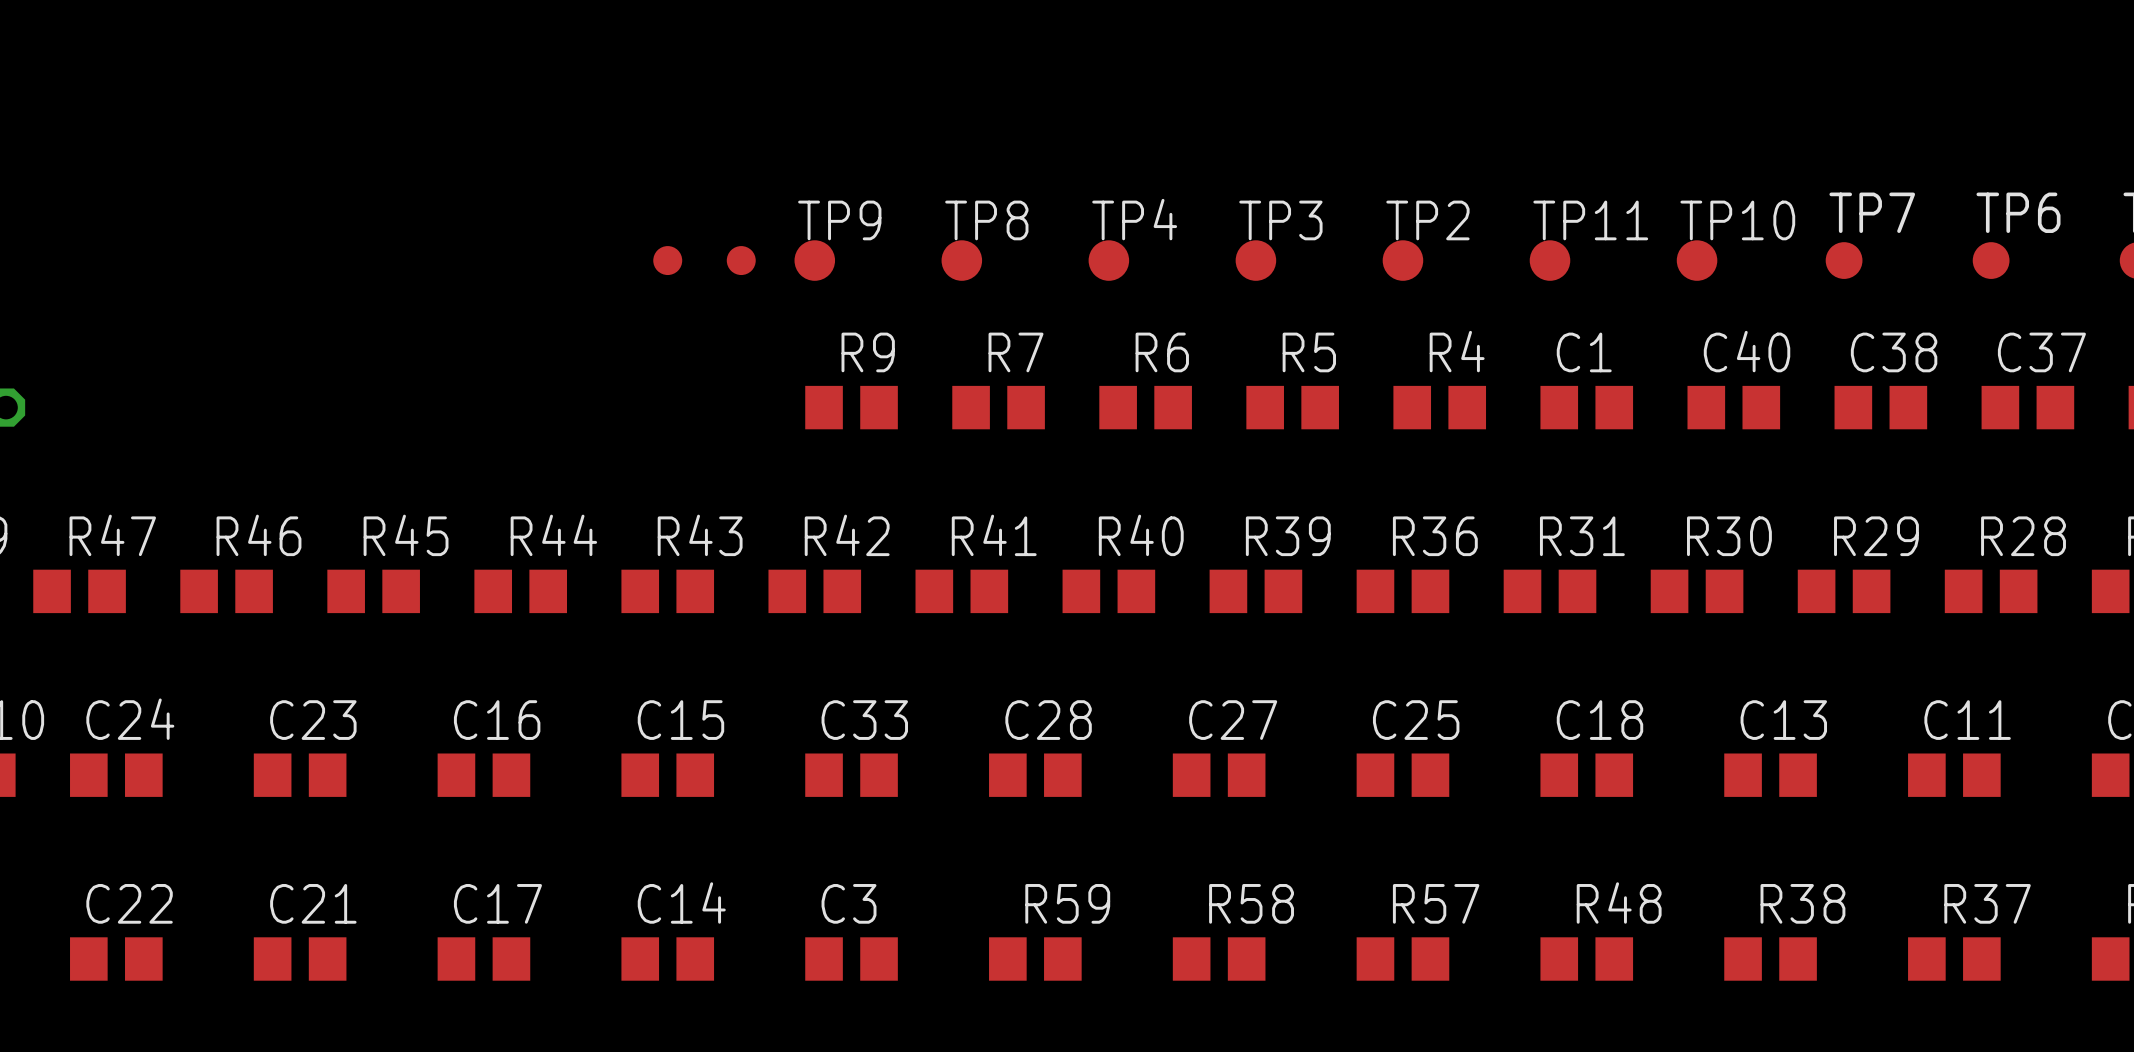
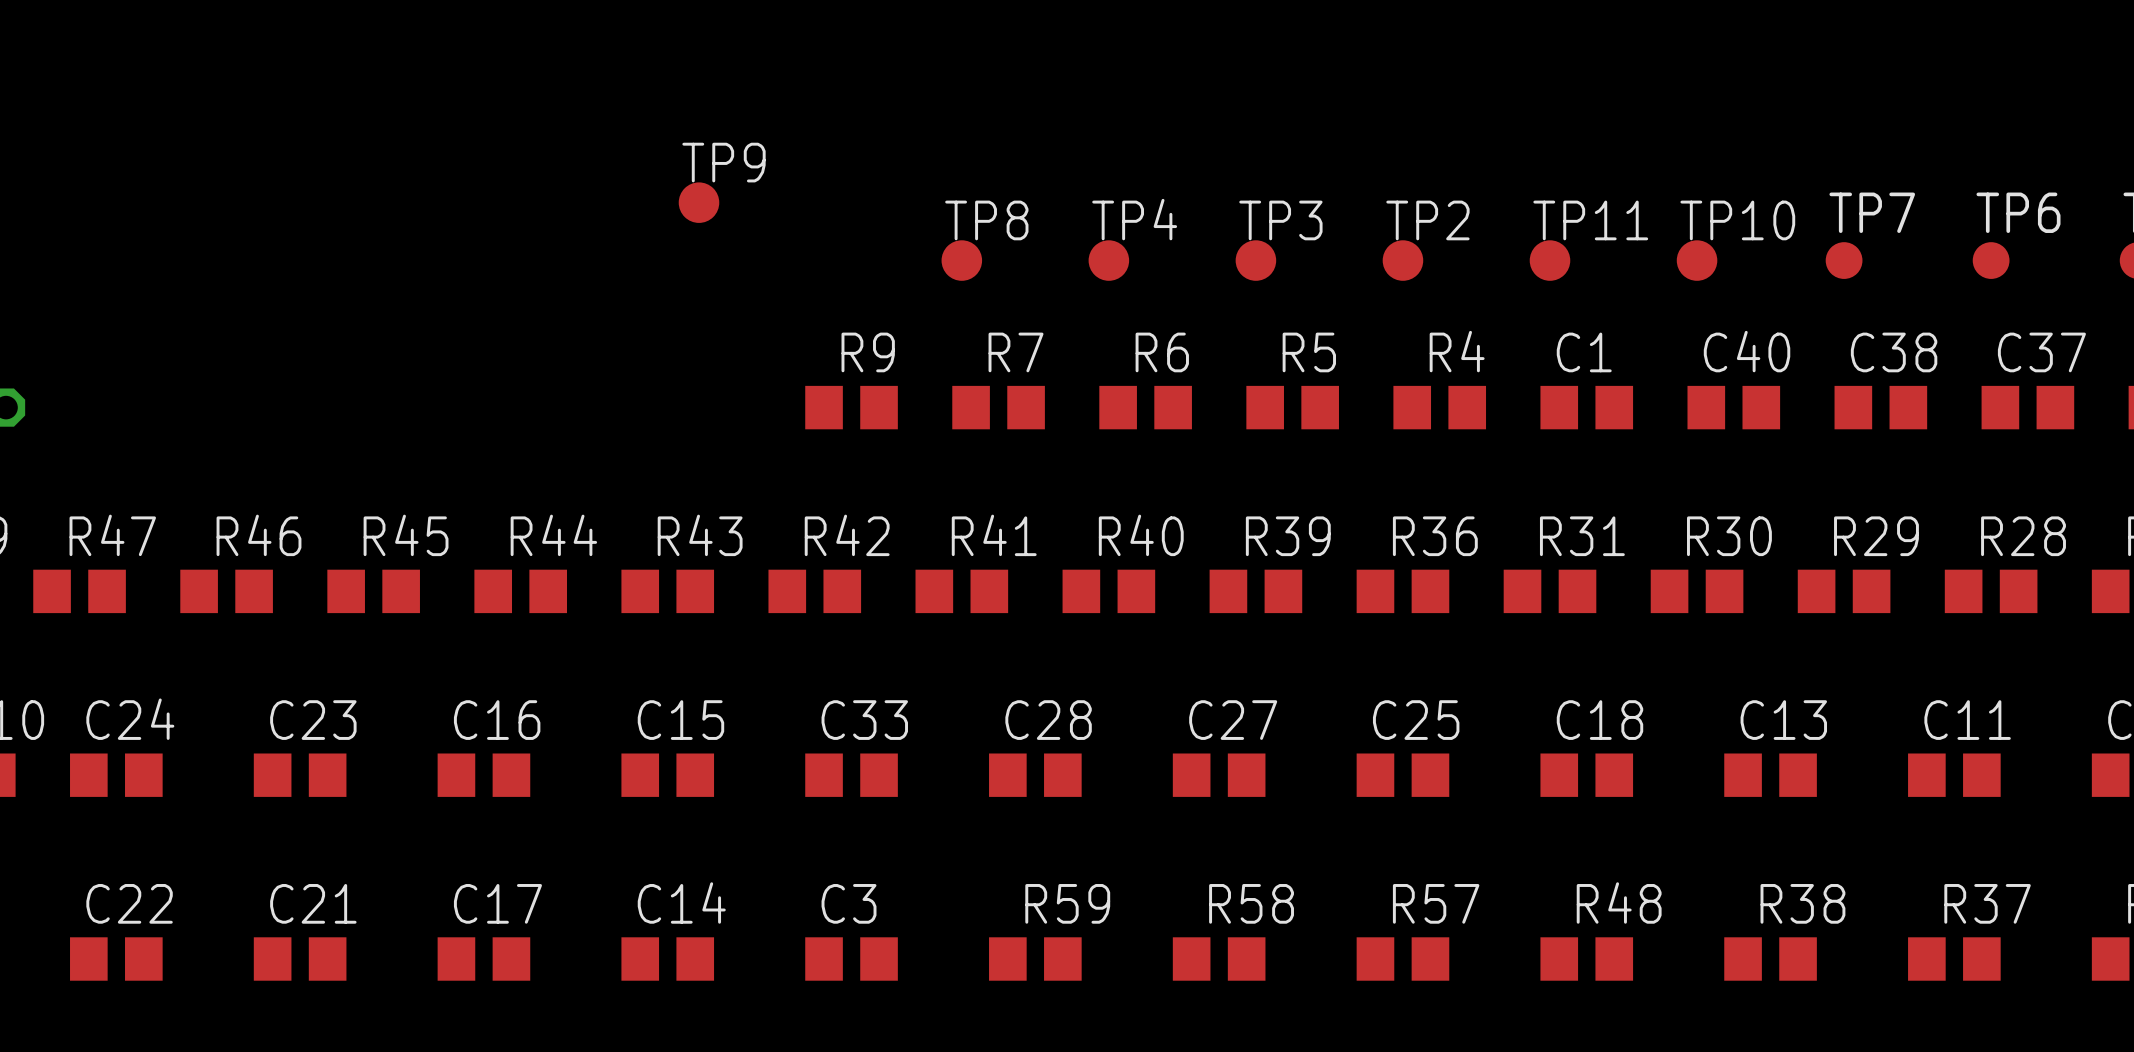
part: (667, 260) -> none
part: (741, 260) -> none
TP9 position: (814, 260) -> (699, 202)

